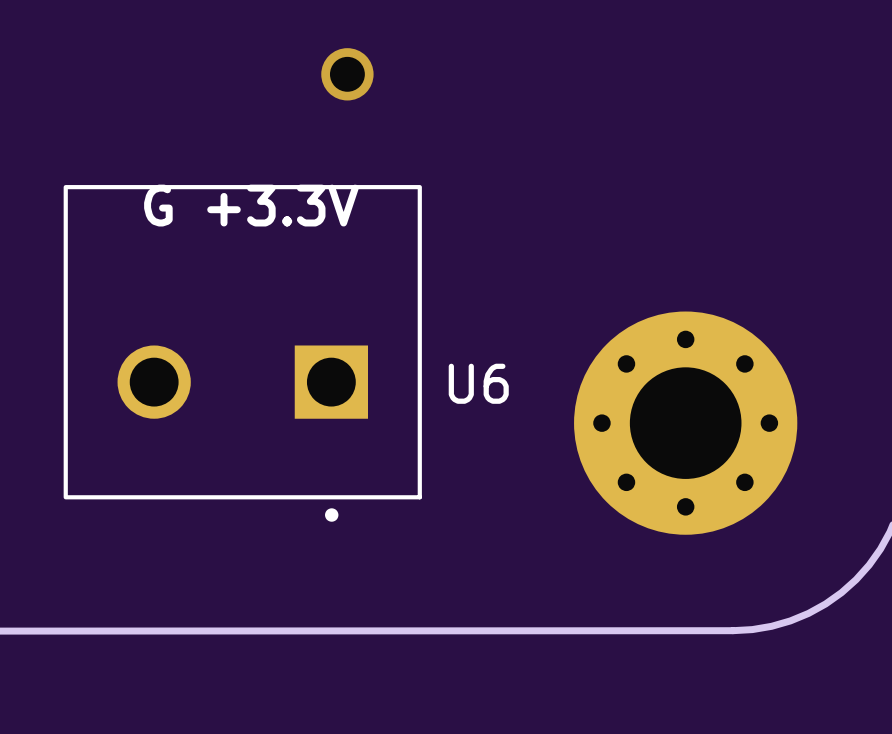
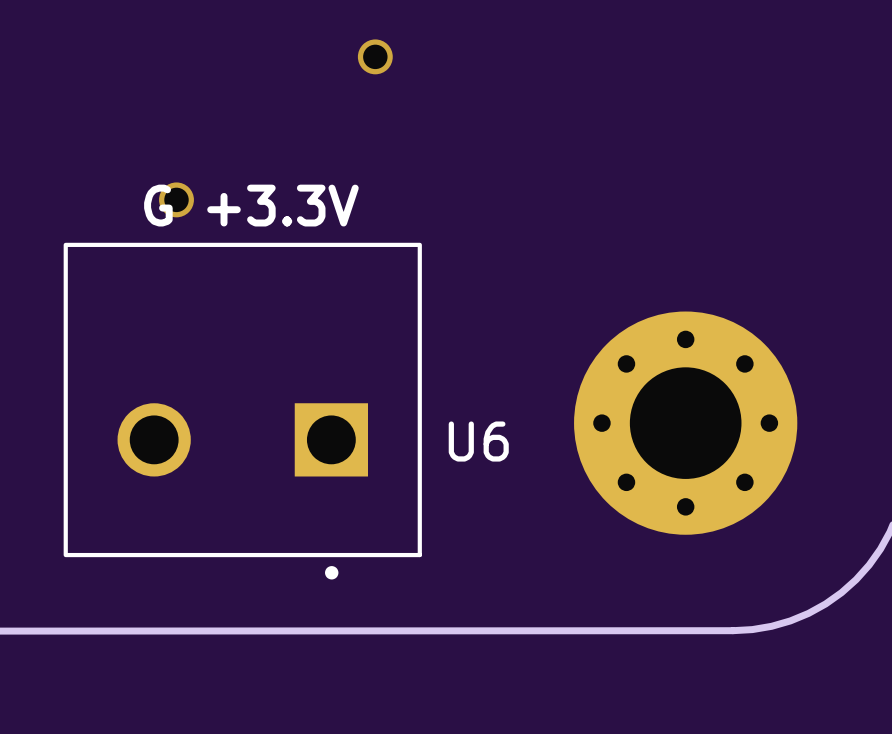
via size: [321, 48, 374, 101] -> [357, 39, 393, 75]
via: none -> (176, 199)
U6 position: (242, 353) -> (242, 411)

